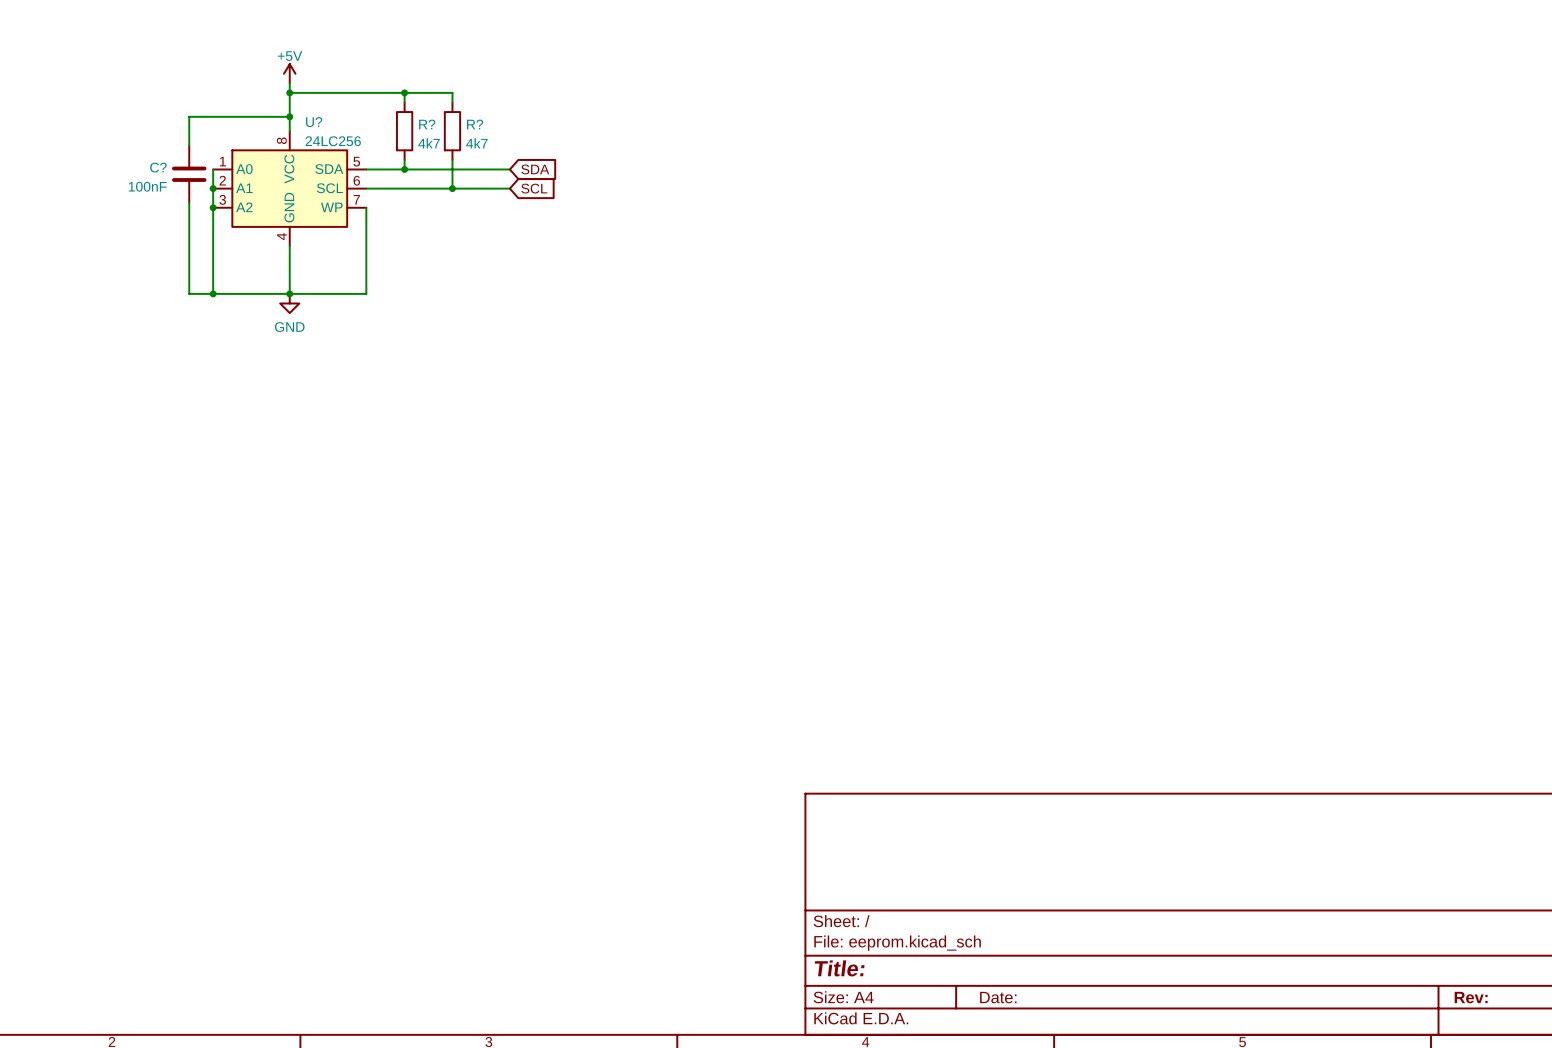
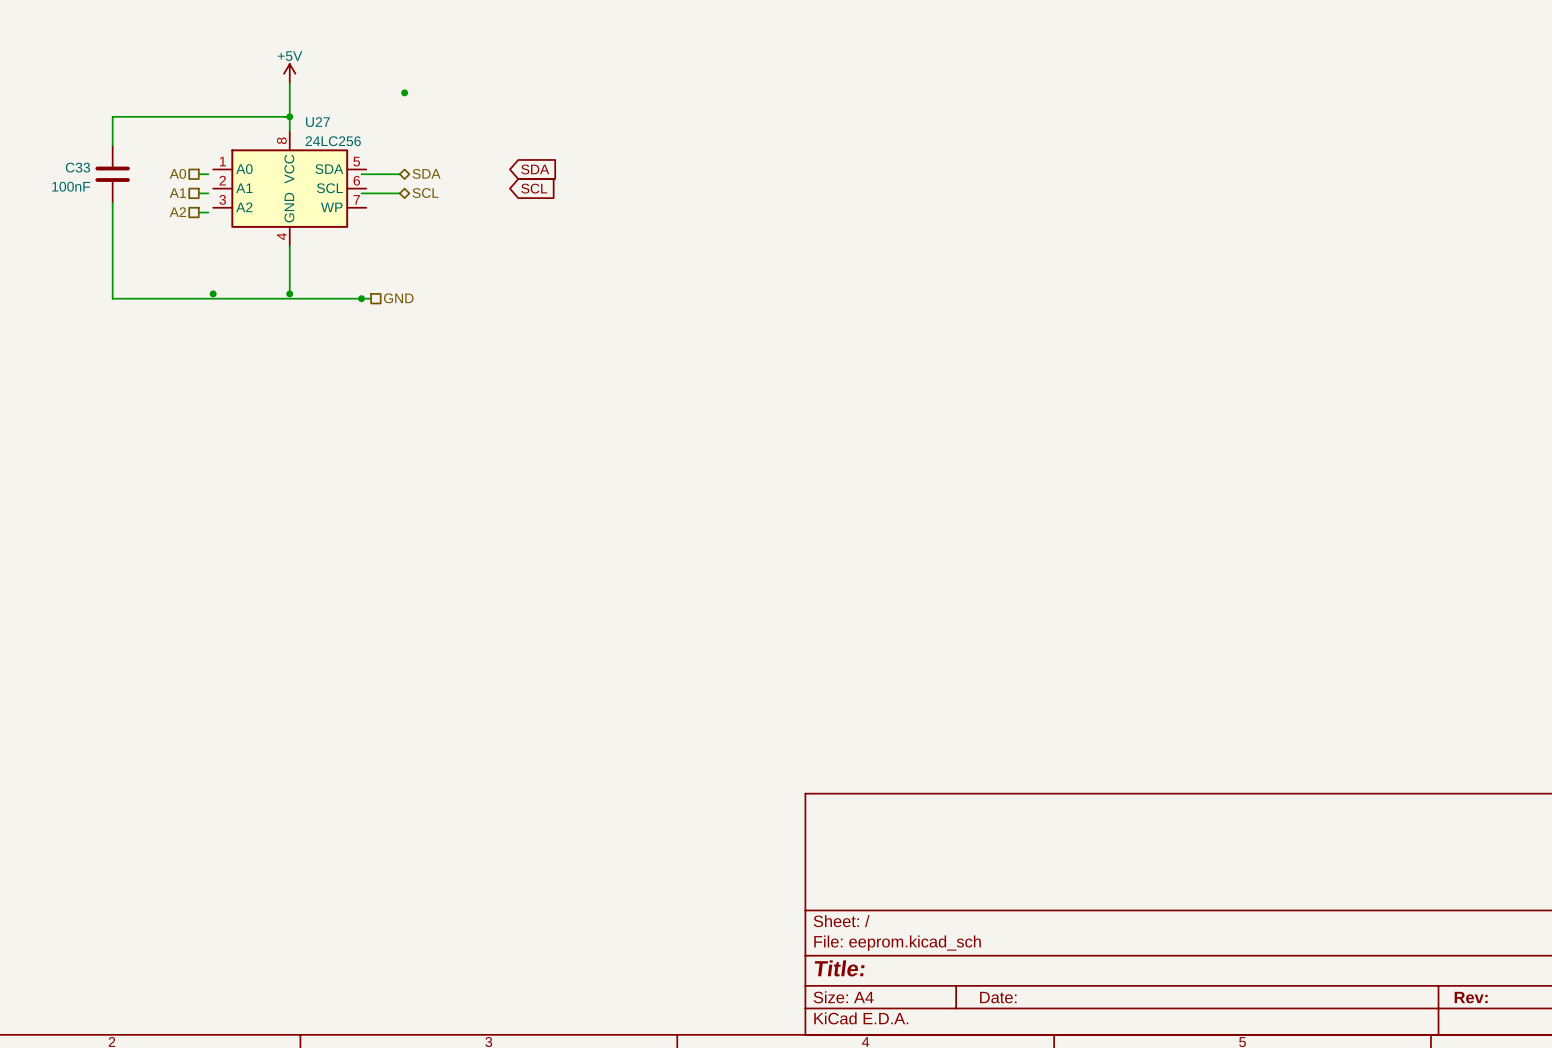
wire: (289, 92) (452, 92) (452, 102) -> none
junction: (289, 92) -> none
wire: (404, 92) (404, 102) -> none
wire: (189, 116) (189, 145) -> (189, 116) (112, 116) (112, 145)
U? name: U? (314, 122) -> U27 (317, 122)
R?: 4k7 (404, 131) -> none
R?: 4k7 (452, 131) -> none
wire: (404, 159) (404, 169) -> none
wire: (452, 159) (452, 188) -> none
wire: (213, 169) (213, 293) -> none
wire: (366, 169) (509, 169) -> none
junction: (404, 169) -> none
hierarchical label: none -> A0 (177, 173)
hierarchical label: none -> SDA (426, 173)
C33: none -> 100nF (112, 174)
C?: 100nF (189, 174) -> none
wire: none -> (198, 174) (208, 174)
wire: none -> (361, 174) (399, 174)
junction: (213, 188) -> none
wire: (366, 188) (509, 188) -> none
junction: (452, 188) -> none
hierarchical label: none -> A1 (177, 193)
wire: none -> (198, 193) (208, 193)
wire: none -> (361, 193) (399, 193)
hierarchical label: none -> SCL (425, 193)
wire: none -> (112, 202) (112, 298) (371, 298)
wire: (189, 202) (189, 293) (366, 293) (366, 207) -> none
junction: (213, 207) -> none
hierarchical label: none -> A2 (177, 212)
wire: none -> (198, 212) (208, 212)
junction: none -> (361, 298)
hierarchical label: none -> GND (398, 298)
power symbol: GND (289, 303) -> none

